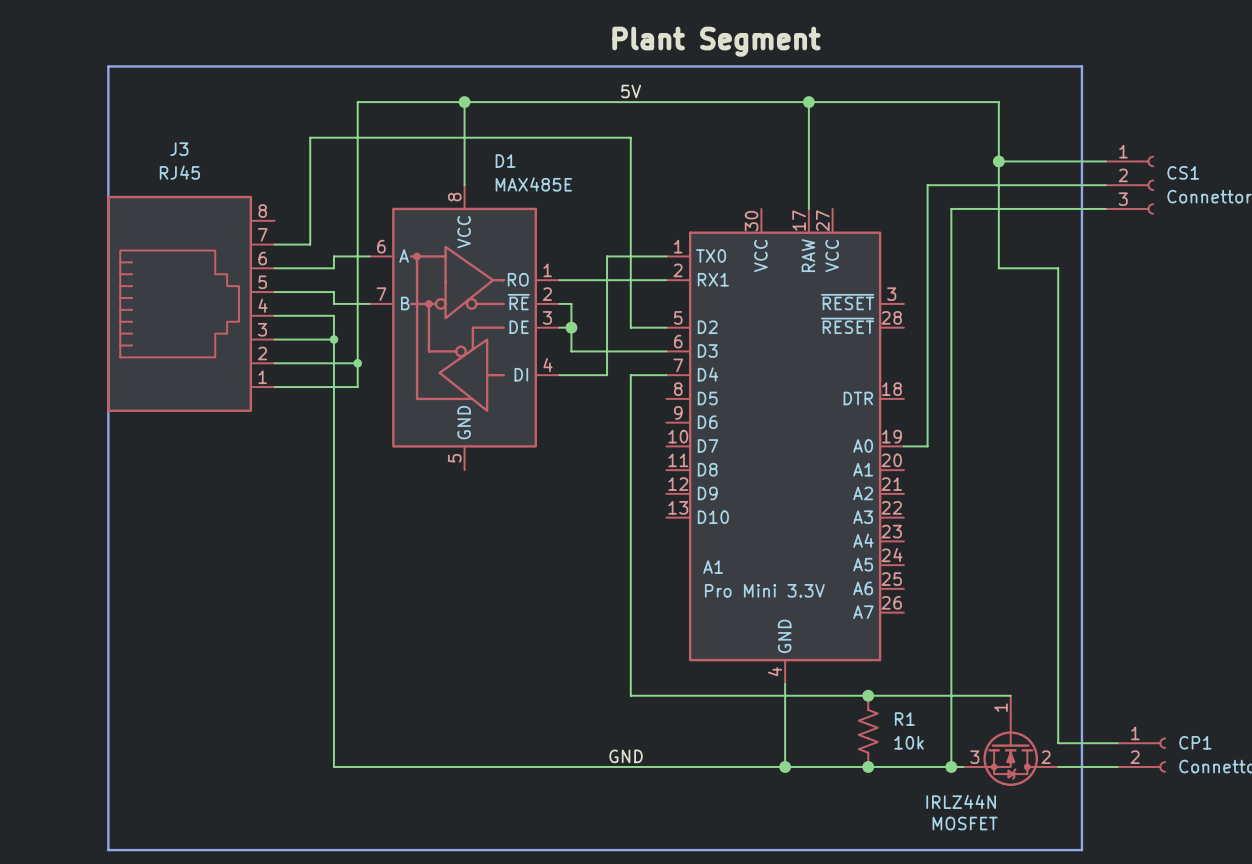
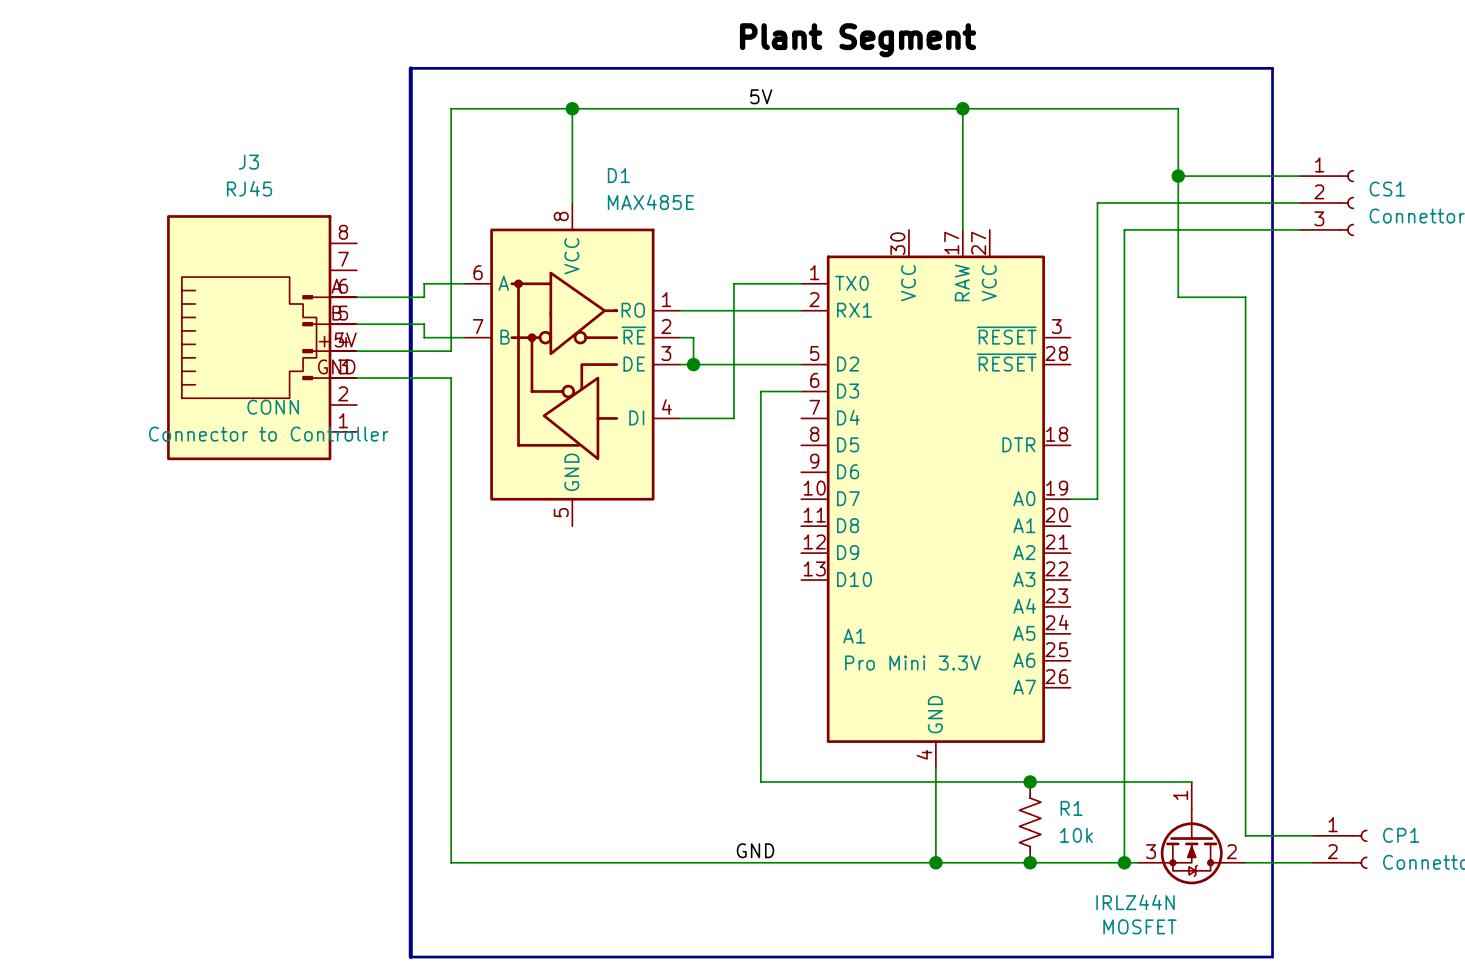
line: (322, 66) (108, 66) (108, 850) (322, 850) -> (410, 68) (410, 957)
wire: (274, 244) (310, 244) (310, 137) (630, 137) (630, 327) -> none
CONN: none -> Connector to Controller (329, 337)
wire: (333, 315) (333, 766) (357, 766) -> (451, 431) (451, 862)
wire: (357, 315) (357, 339) -> (451, 351) (424, 351)
wire: (571, 327) (571, 351) (630, 351) -> (693, 364) (760, 364)
wire: none -> (424, 378) (451, 378)
junction: (333, 339) -> none
wire: (274, 363) (357, 363) -> none
junction: (357, 363) -> none
wire: (630, 375) (666, 375) -> (760, 418) (760, 391)
wire: (274, 387) (357, 387) -> none

